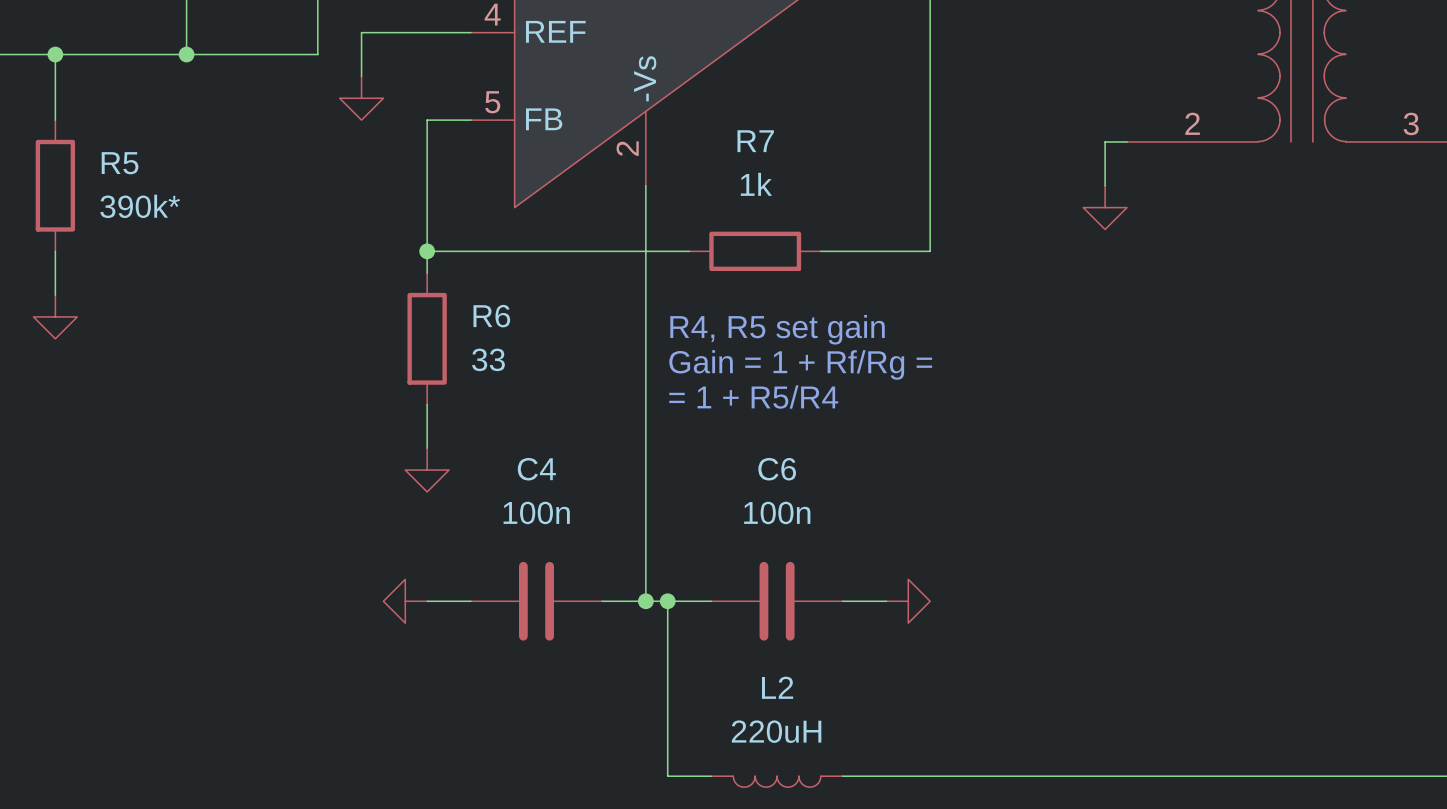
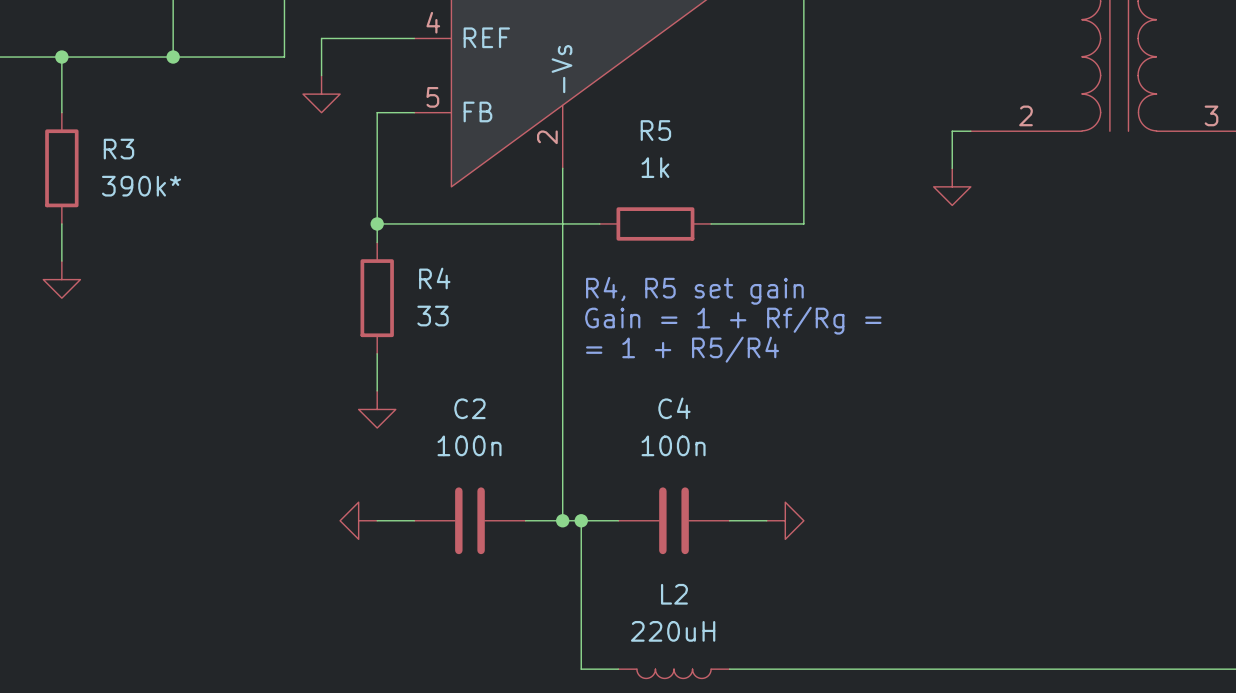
R7 name: R7 (755, 141) -> R5 (655, 130)
R5 name: R5 (120, 163) -> R3 (118, 149)
R6 name: R6 (491, 316) -> R4 (434, 278)
C4 name: C4 (536, 469) -> C2 (469, 408)
C6 name: C6 (777, 469) -> C4 (674, 408)

